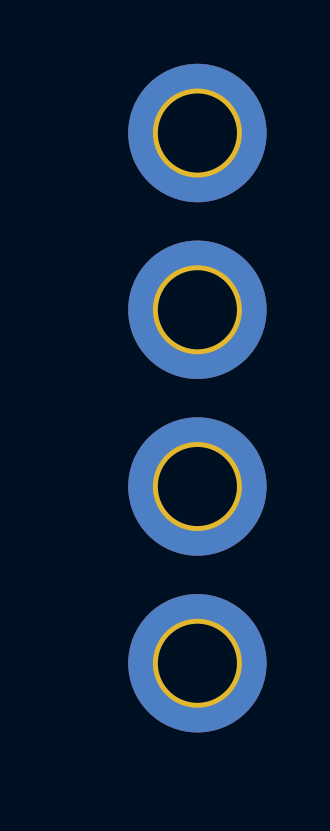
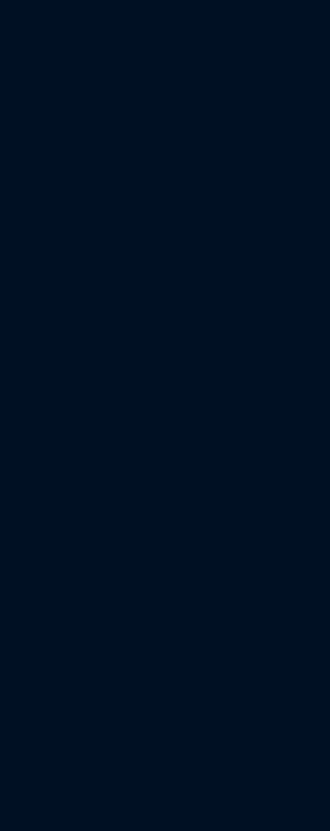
part: (197, 133) -> none
part: (197, 309) -> none
part: (197, 486) -> none
part: (197, 663) -> none

